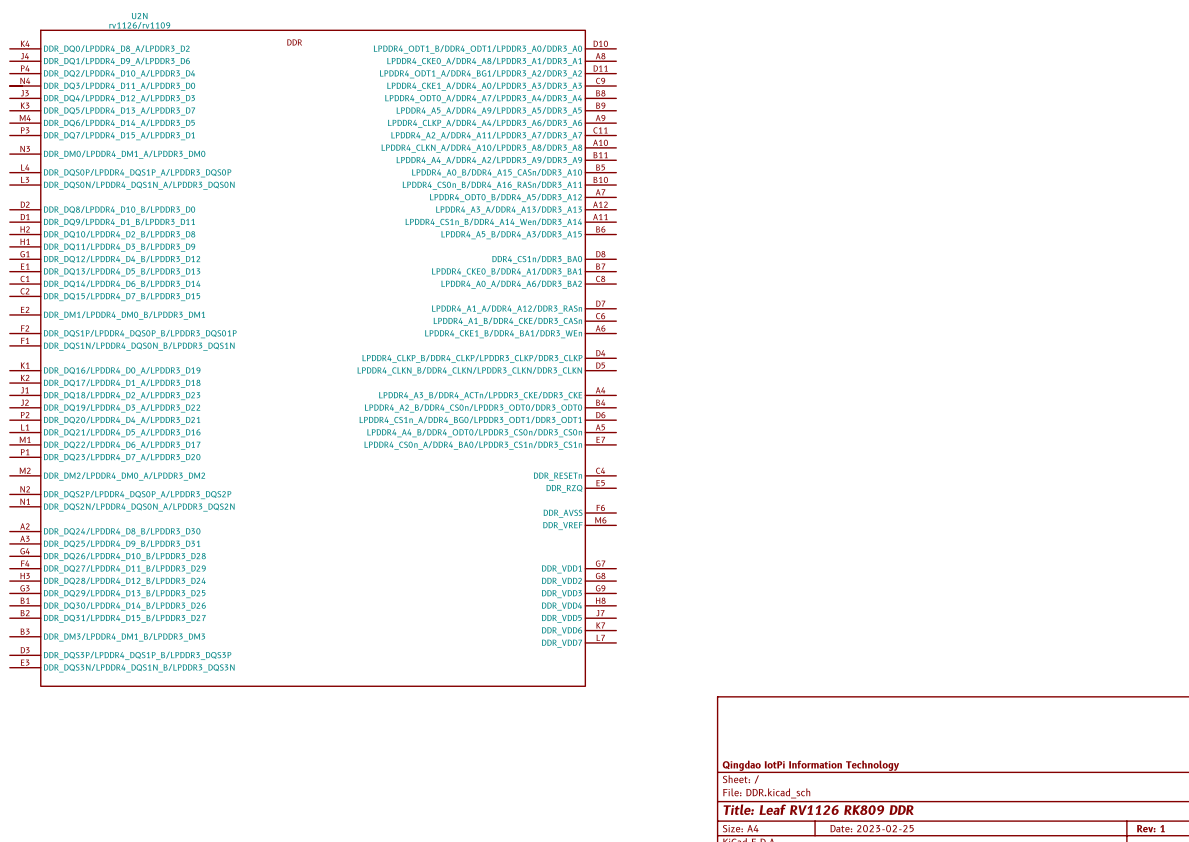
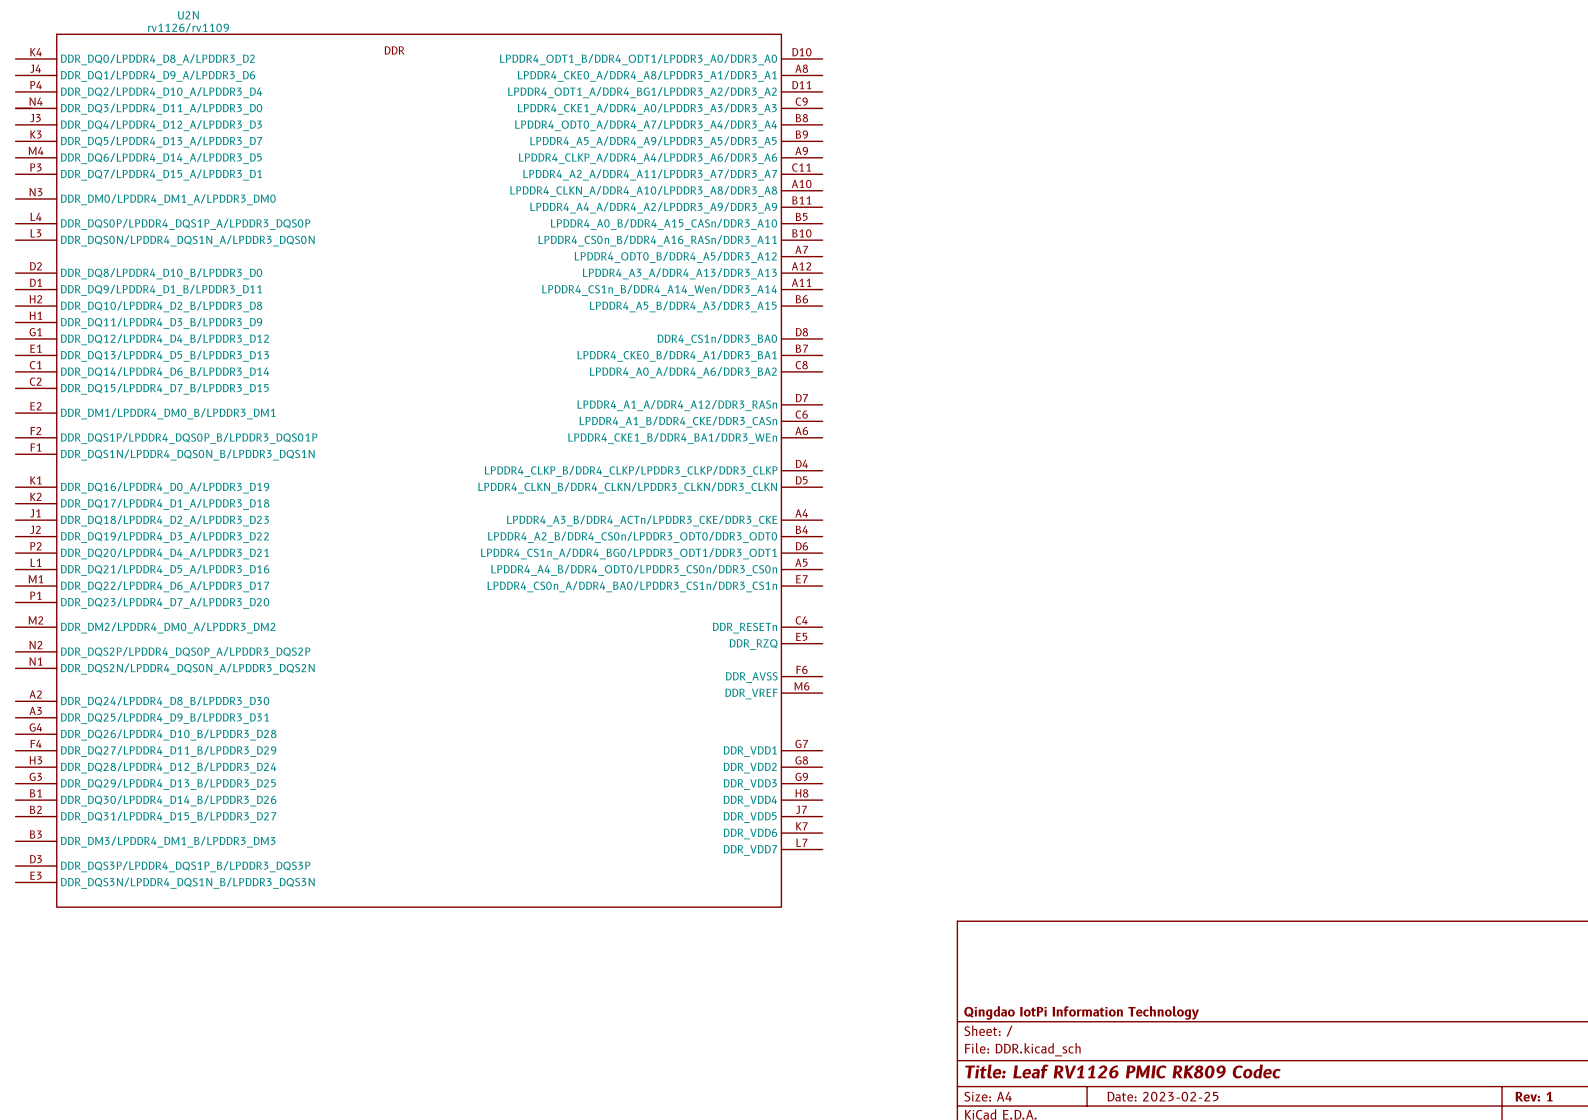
title block: Title: Leaf RV1126 RK809 DDR (818, 809) -> Title: Leaf RV1126 PMIC RK809 Codec (1123, 1071)

